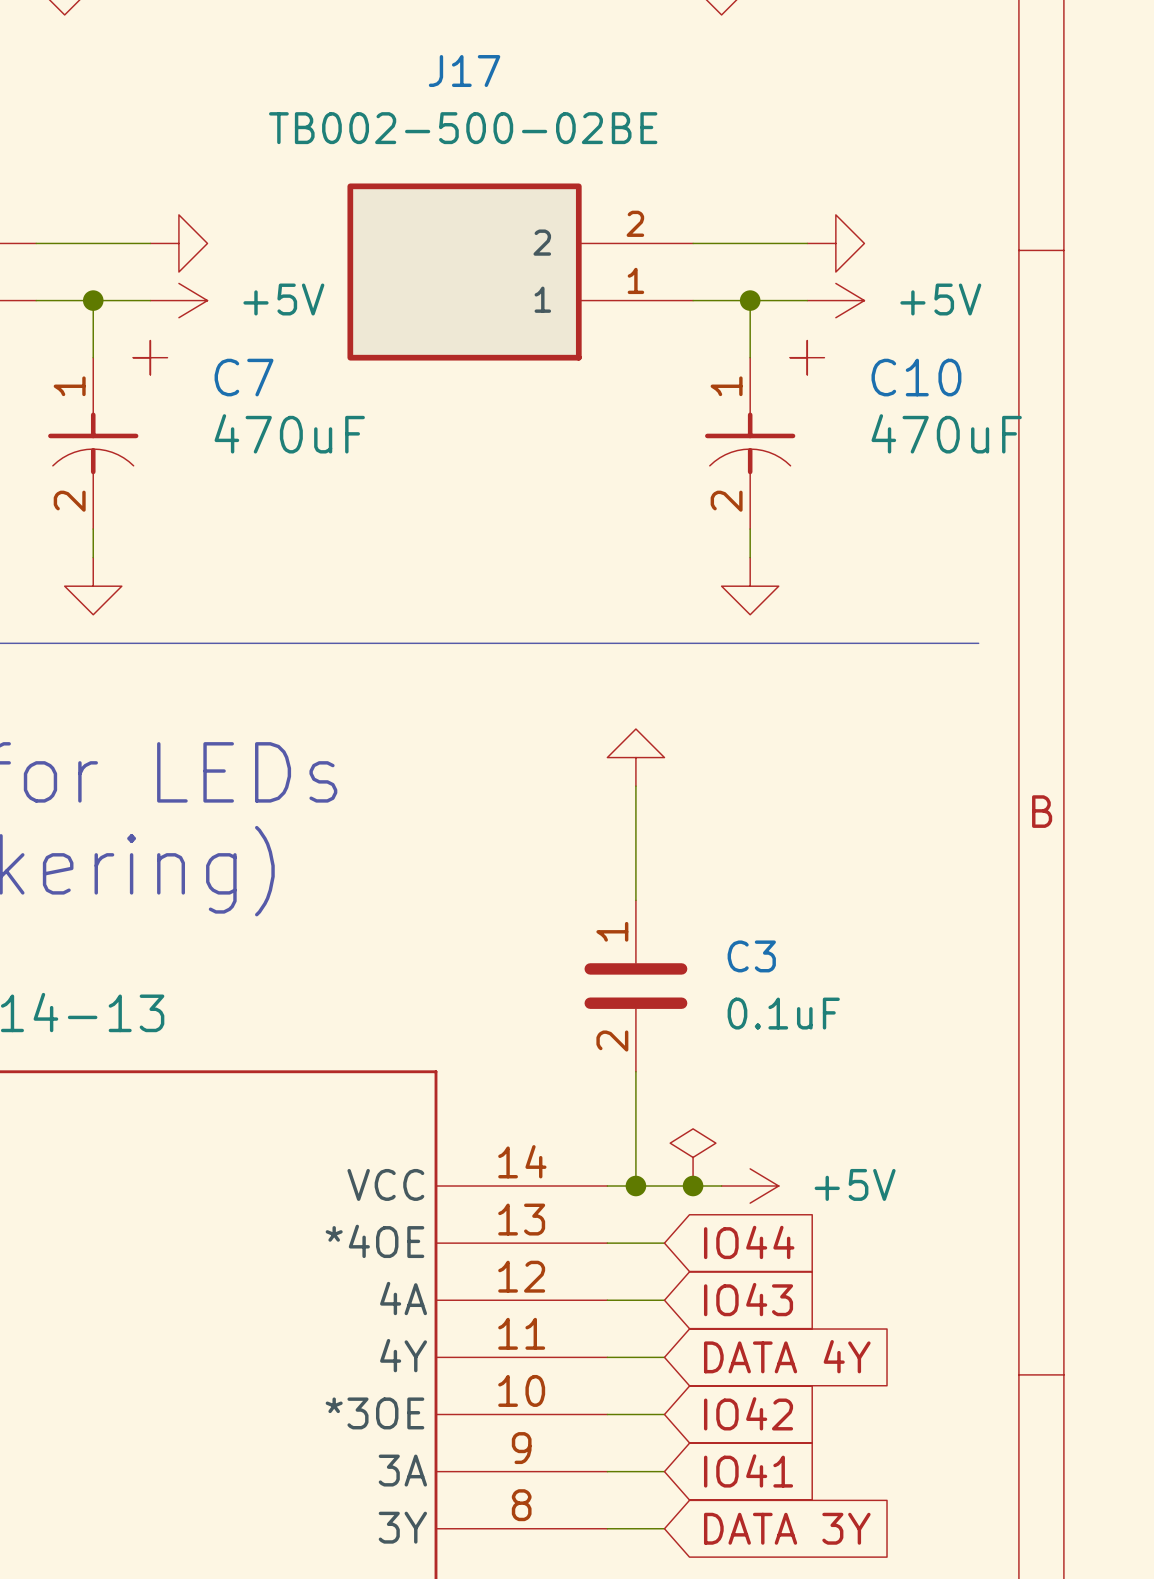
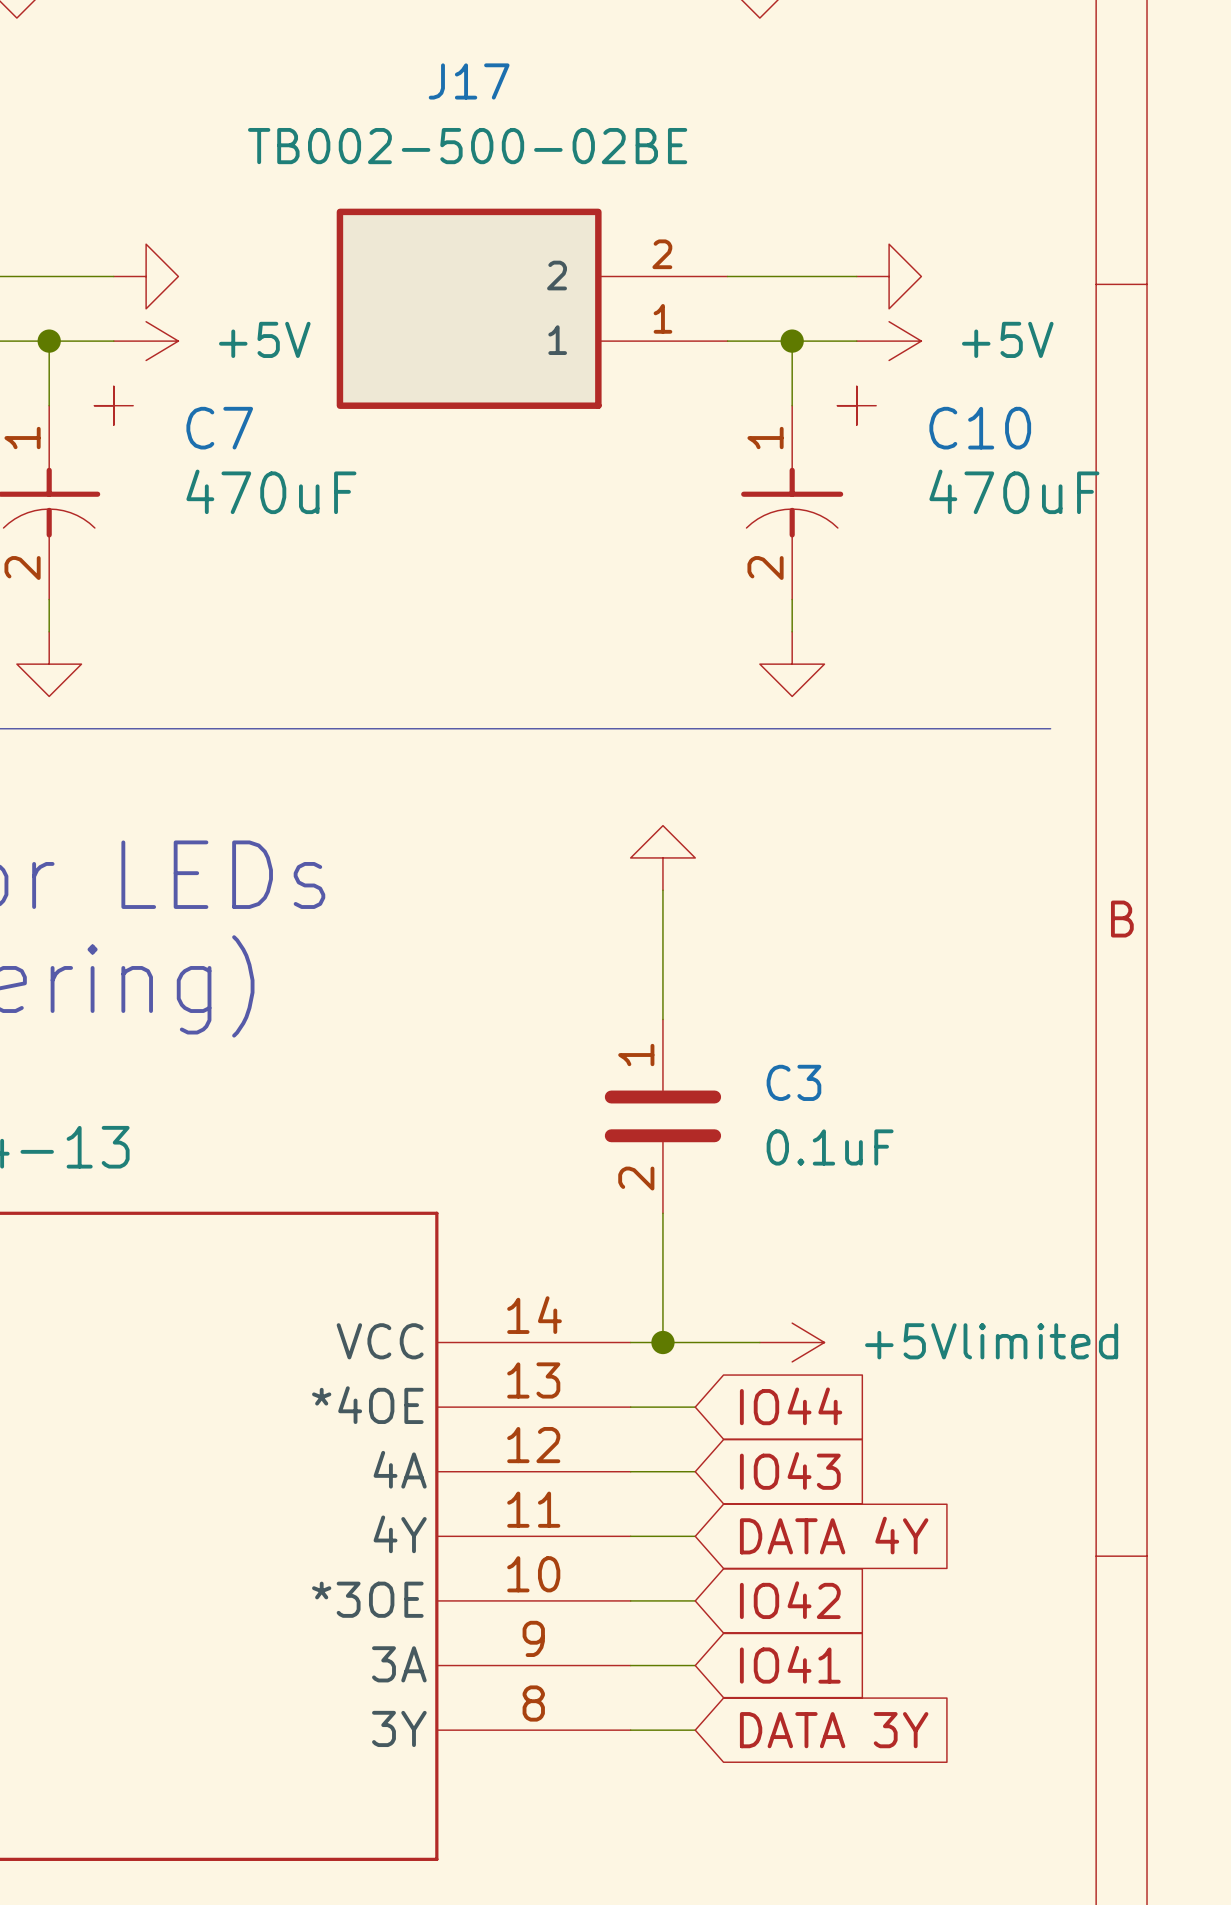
power symbol: (693, 1157) -> none
junction: (693, 1186) -> none
power symbol: +5V (750, 1186) -> +5Vlimited (792, 1342)

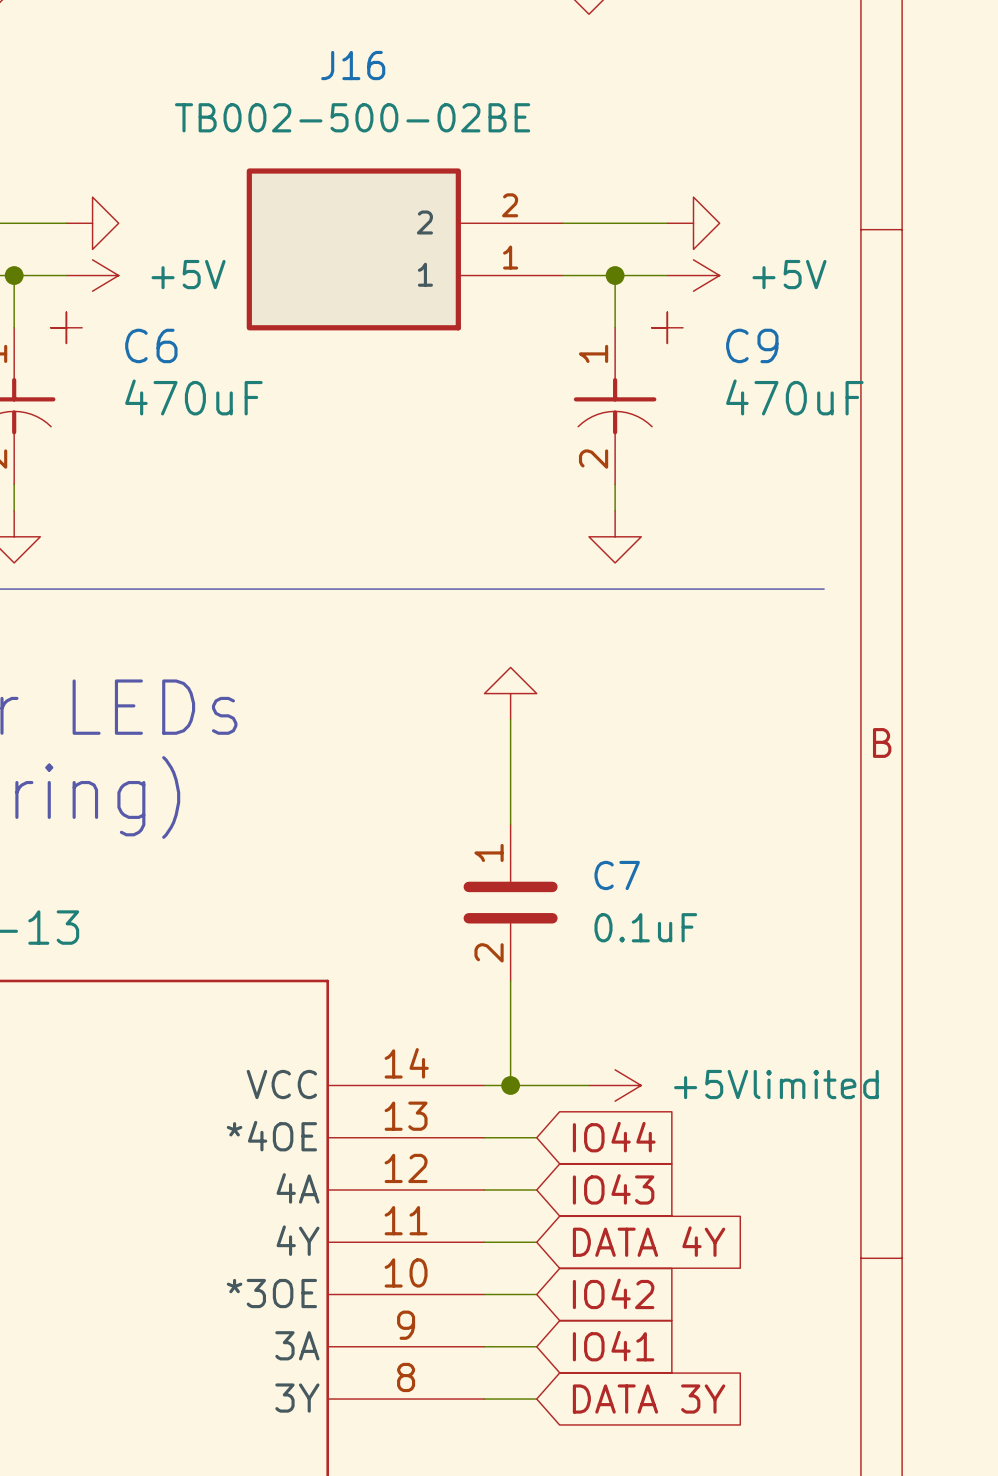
J17 name: J17 (469, 81) -> J16 (353, 65)
C7 name: C7 (219, 428) -> C6 (151, 345)
C10 name: C10 (980, 428) -> C9 (752, 345)
C3 name: C3 (793, 1082) -> C7 (617, 875)

